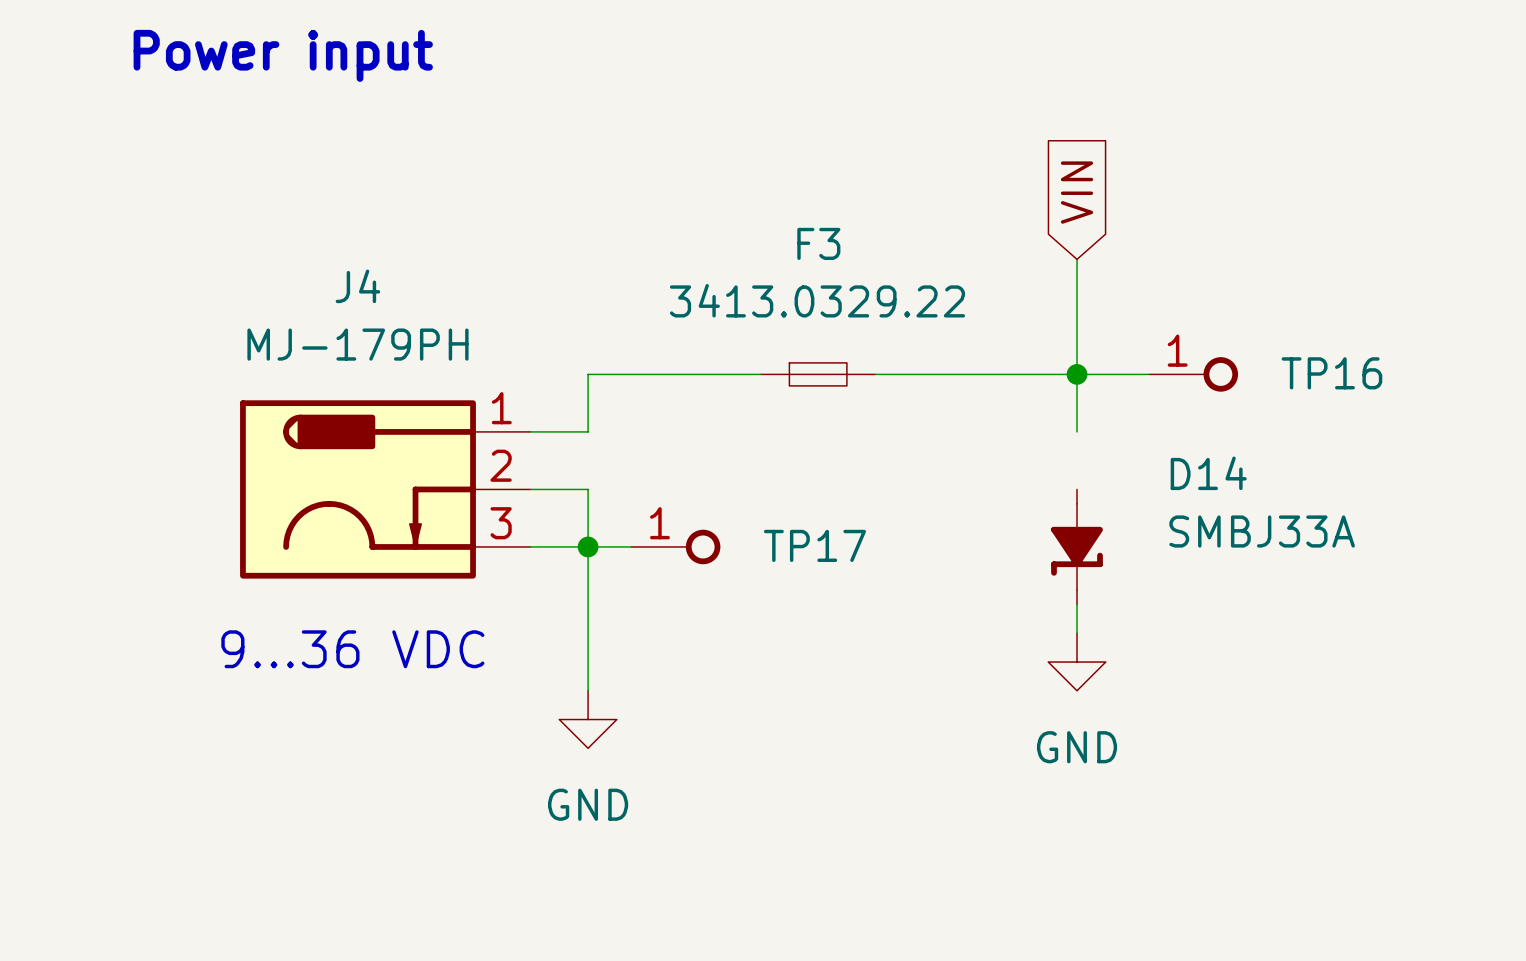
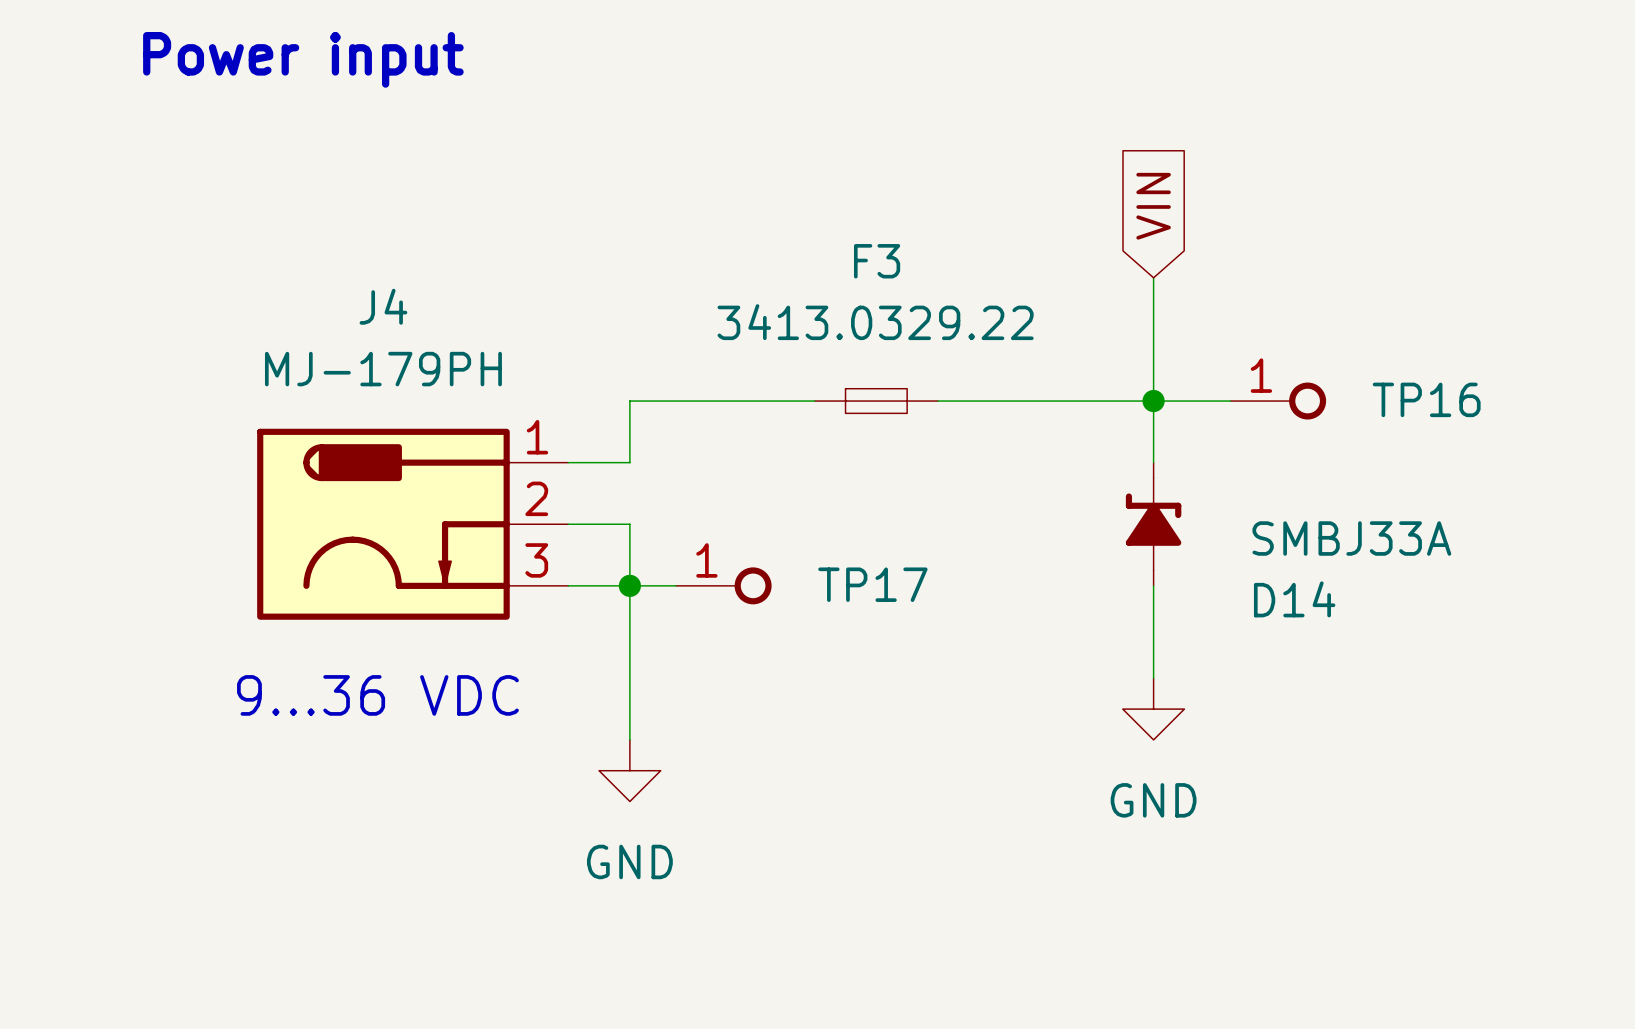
D14 flip: as is (1077, 546) -> up-down (1153, 524)

